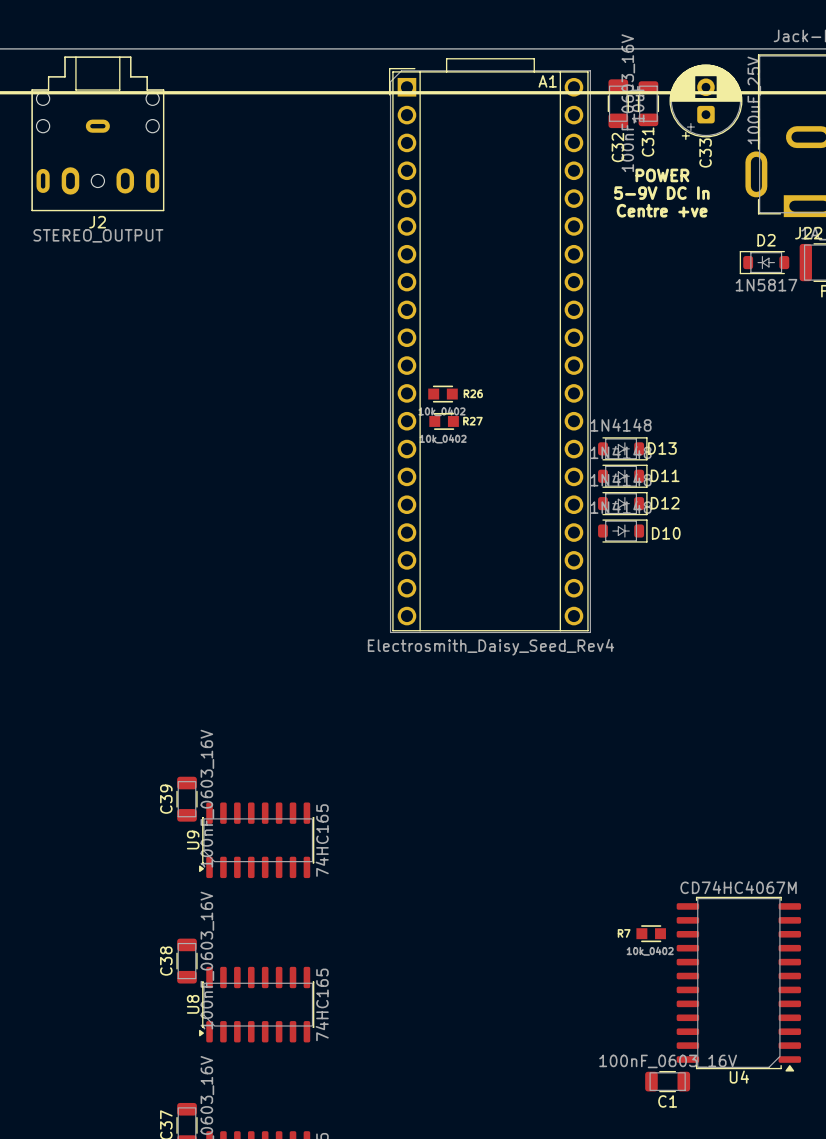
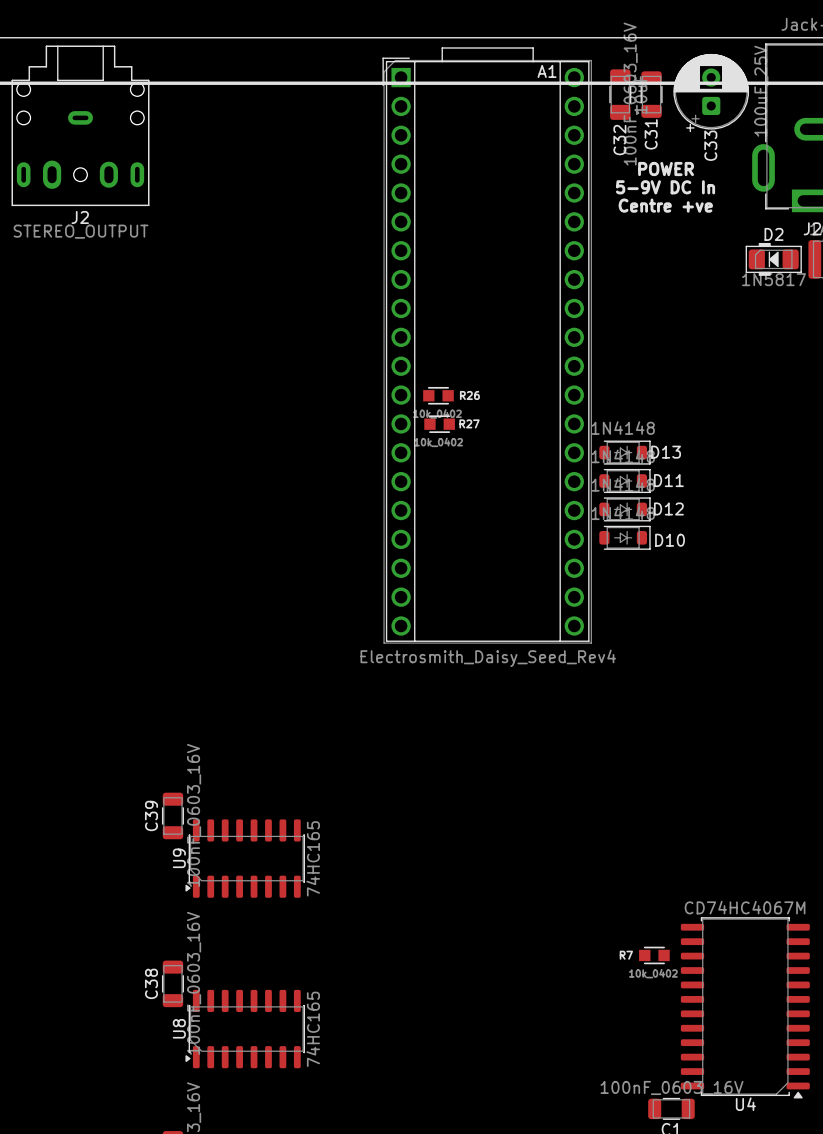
D2 footprint: [739, 250, 790, 275] -> [745, 242, 802, 276]

